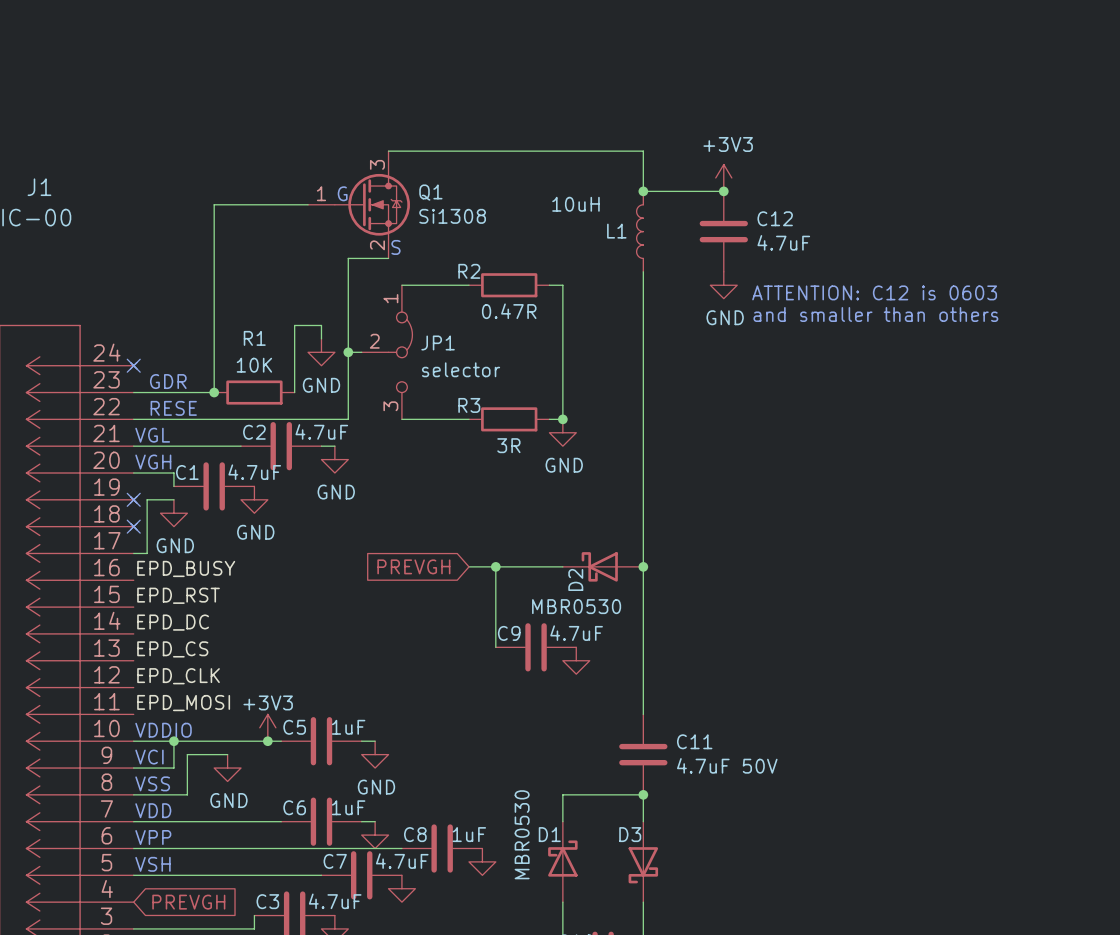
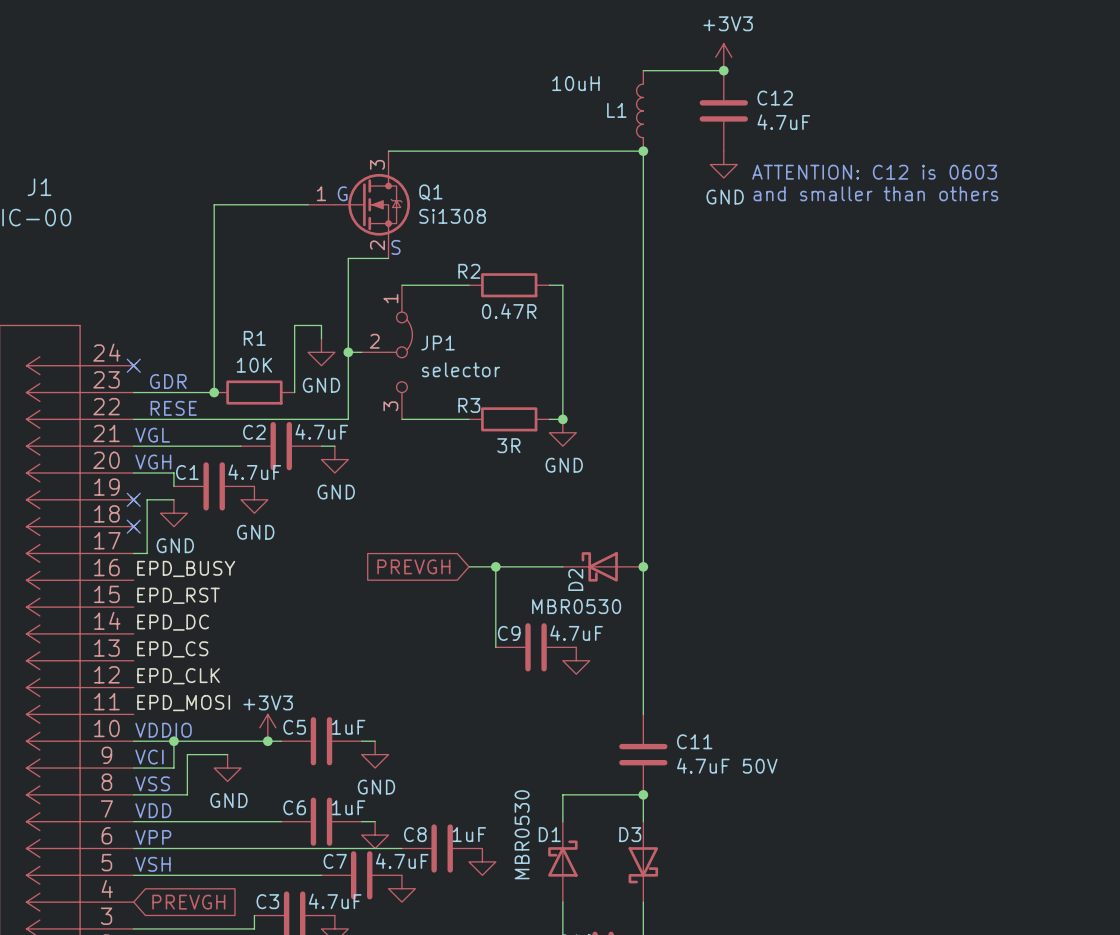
wire: none -> (643, 70) (723, 70)
junction: none -> (723, 70)
power symbol position: +3V3 (723, 177) -> +3V3 (723, 57)
wire: (643, 191) (723, 191) -> (643, 191) (643, 271)
junction position: (643, 191) -> (643, 151)
junction: (723, 191) -> none
L1 position: (639, 231) -> (639, 110)
C12 position: (723, 231) -> (723, 110)
power symbol position: GND (723, 285) -> GND (723, 164)
text position: ATTENTION: C12 is 0603 (874, 292) -> ATTENTION: C12 is 0603 (874, 172)
text position: and smaller than others (875, 314) -> and smaller than others (875, 193)

